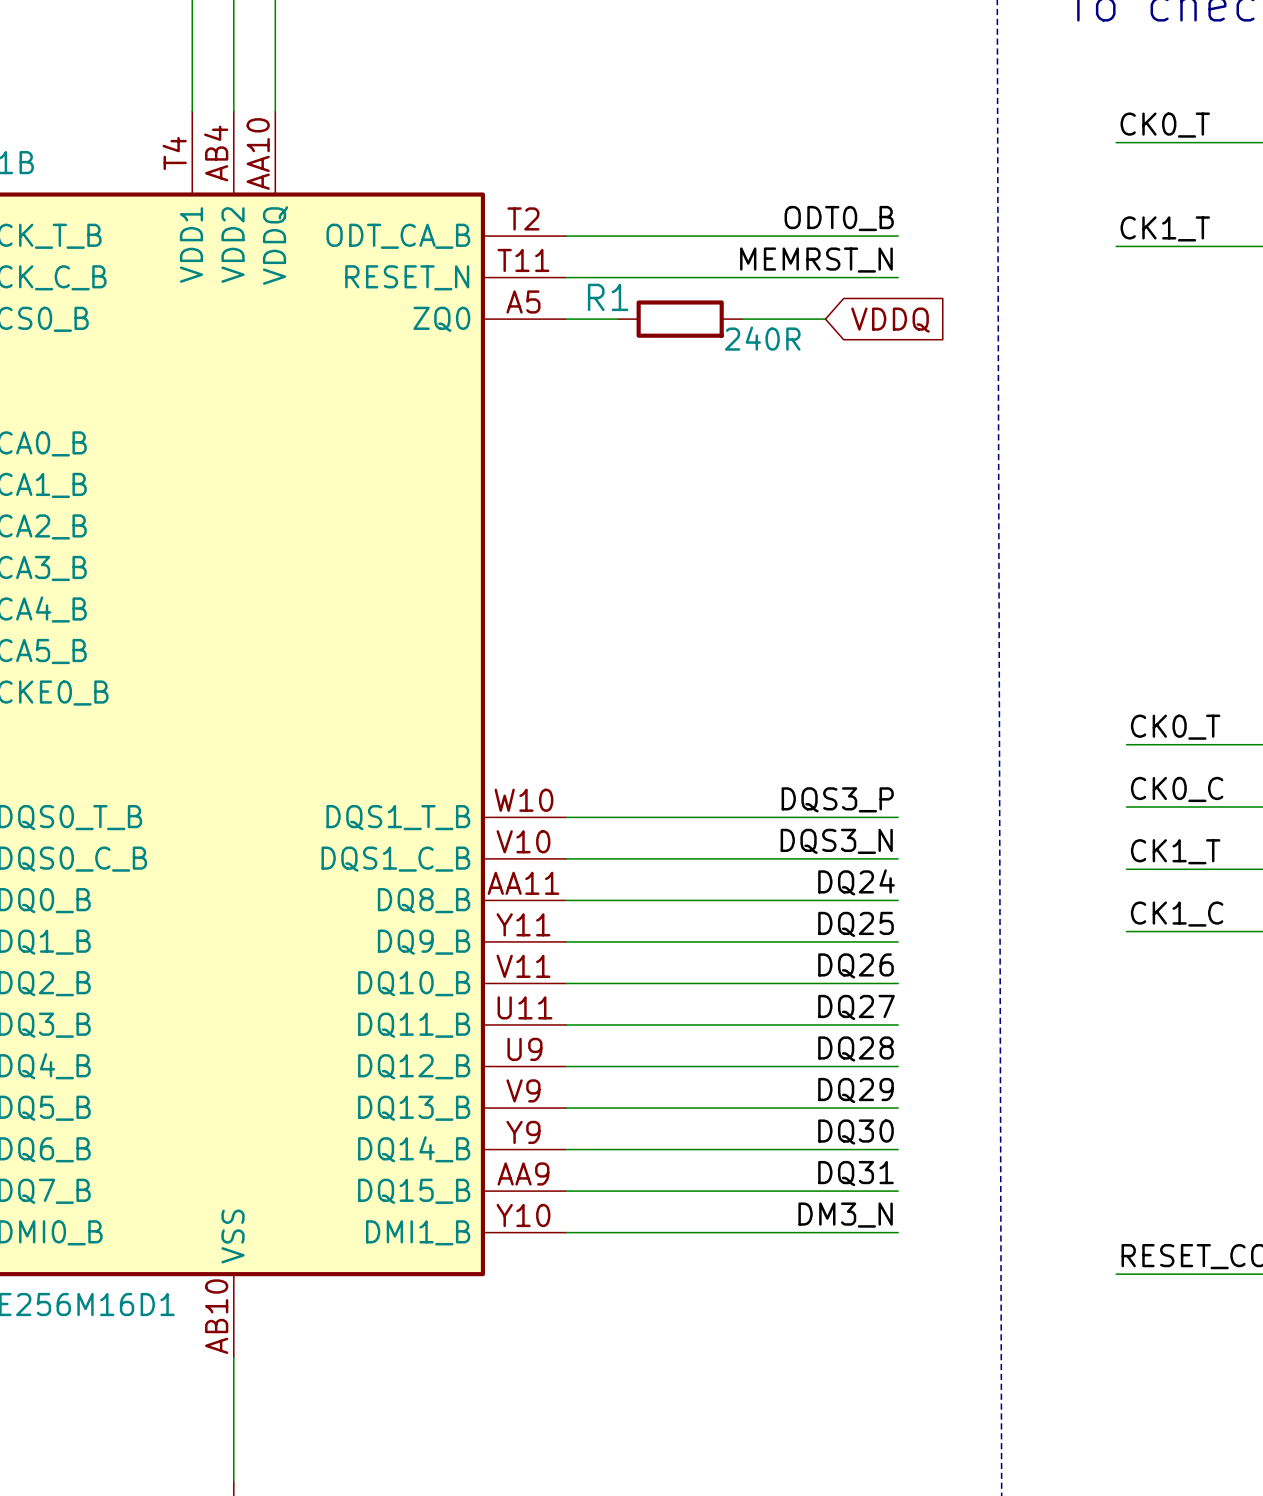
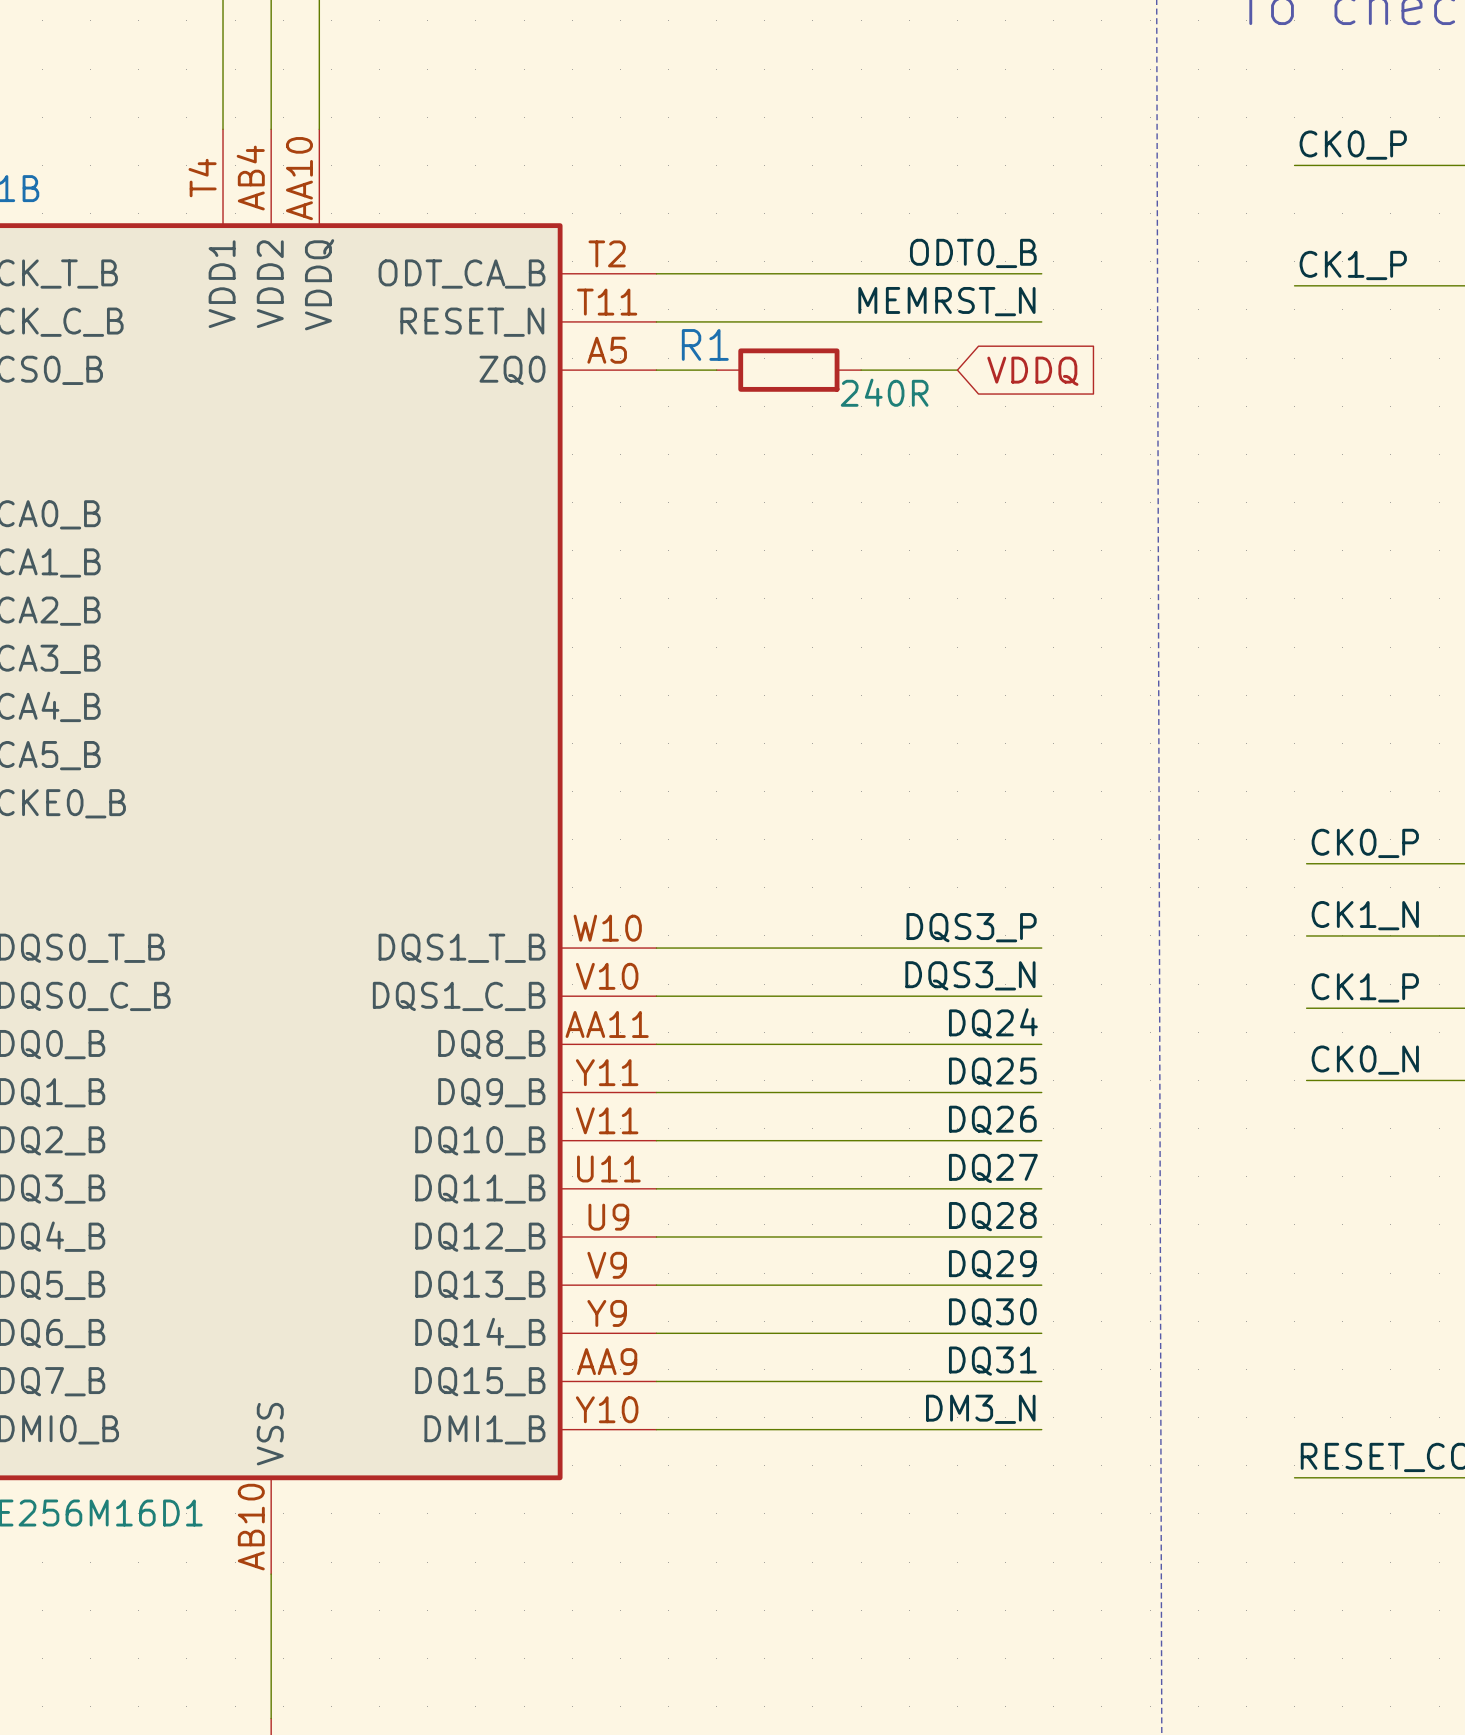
label: CK0_T (1165, 125) -> CK0_P (1353, 145)
label: CK1_T (1165, 228) -> CK1_P (1353, 265)
label: CK0_T (1175, 727) -> CK0_P (1365, 843)
label: CK0_C (1177, 789) -> CK1_N (1365, 915)
label: CK1_T (1175, 851) -> CK1_P (1365, 987)
label: CK1_C (1177, 914) -> CK0_N (1365, 1060)

